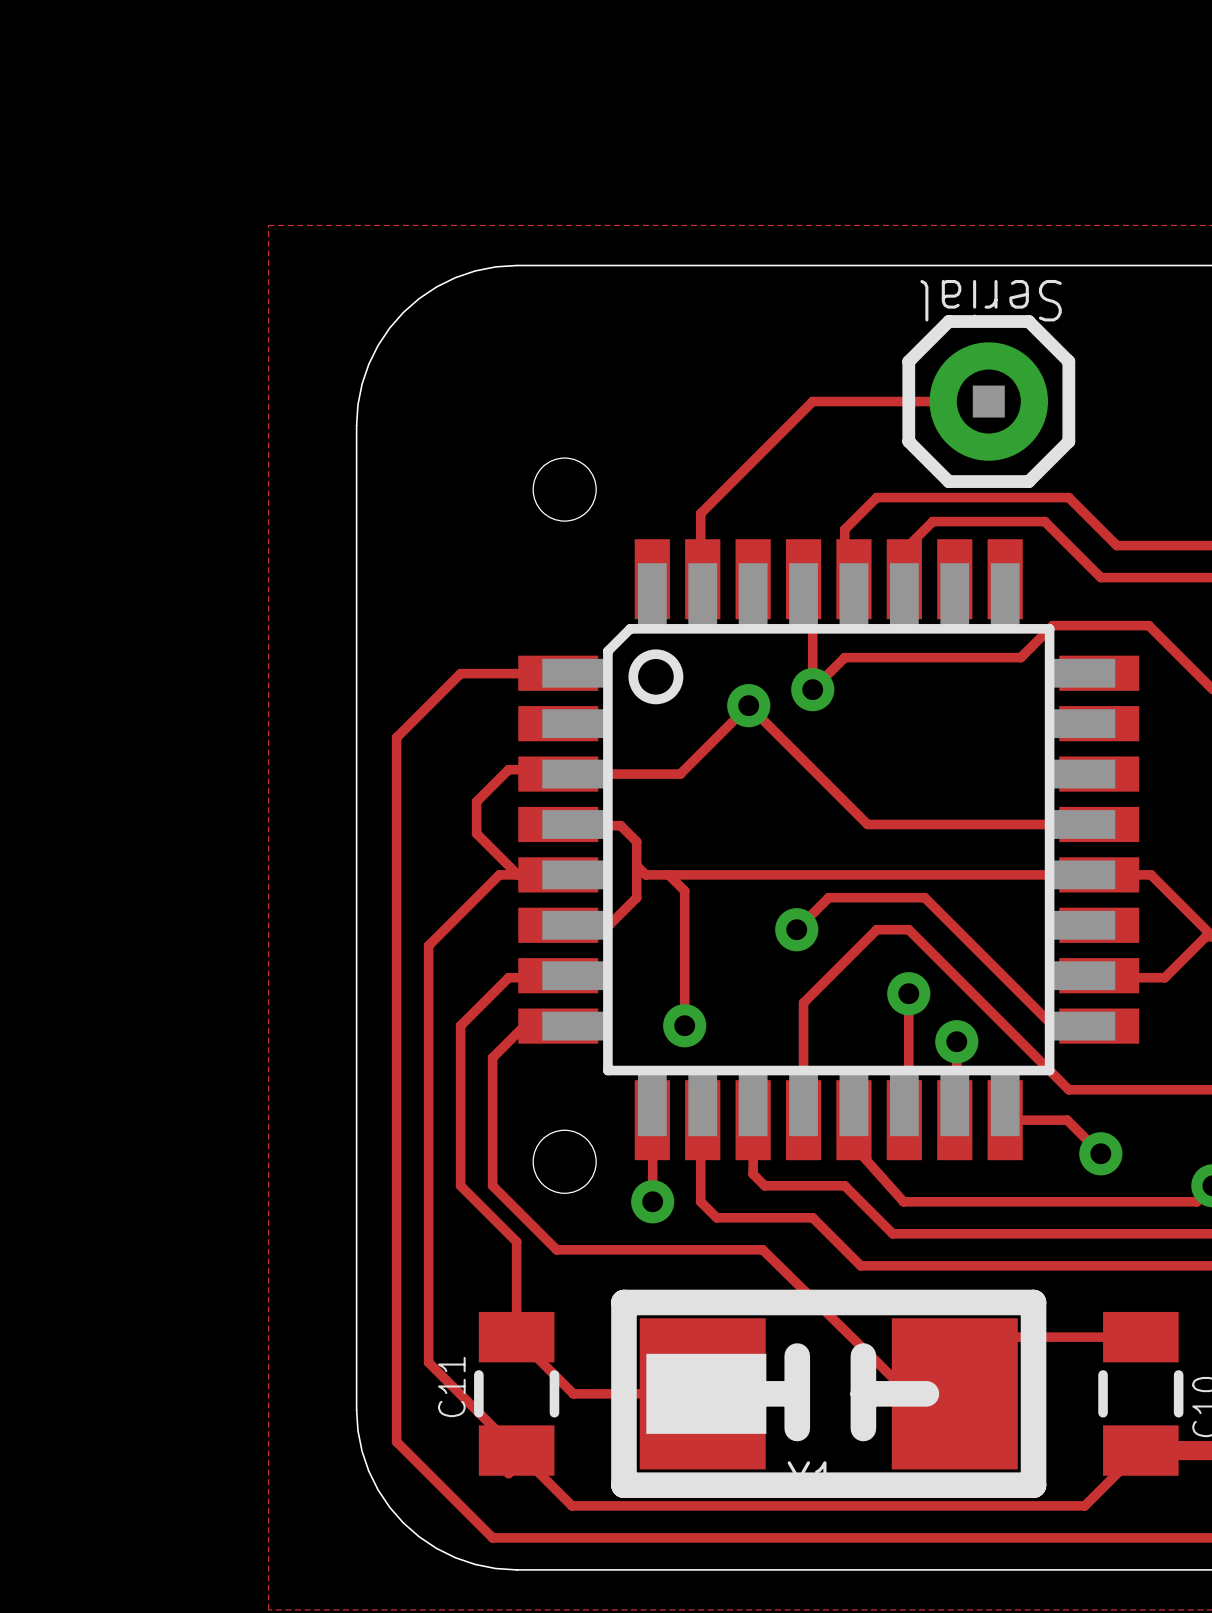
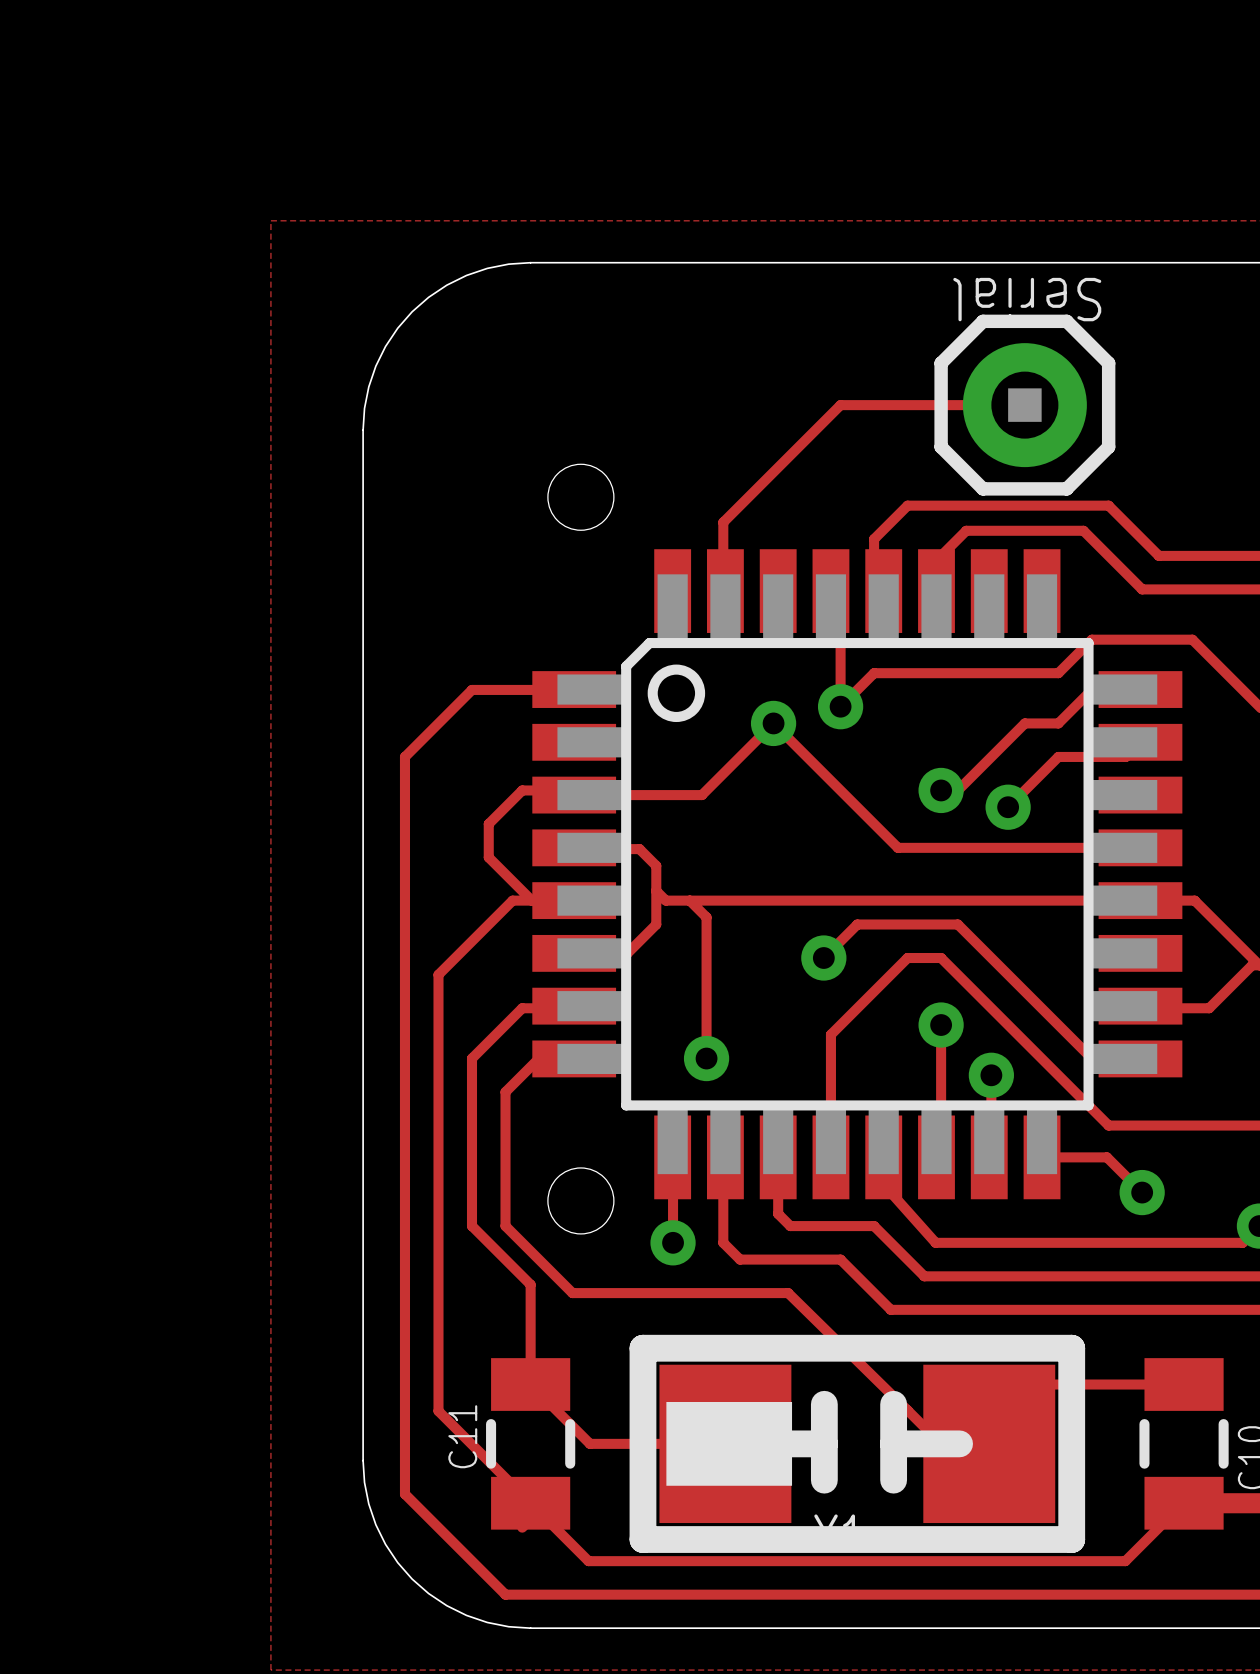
track: none -> (1140, 689) (1091, 689) (1058, 723) (1024, 723) (957, 790) (941, 790)
track: none -> (1140, 742) (1125, 756) (1058, 756) (1008, 807)
via: none -> (941, 790)
via: none -> (1008, 807)

